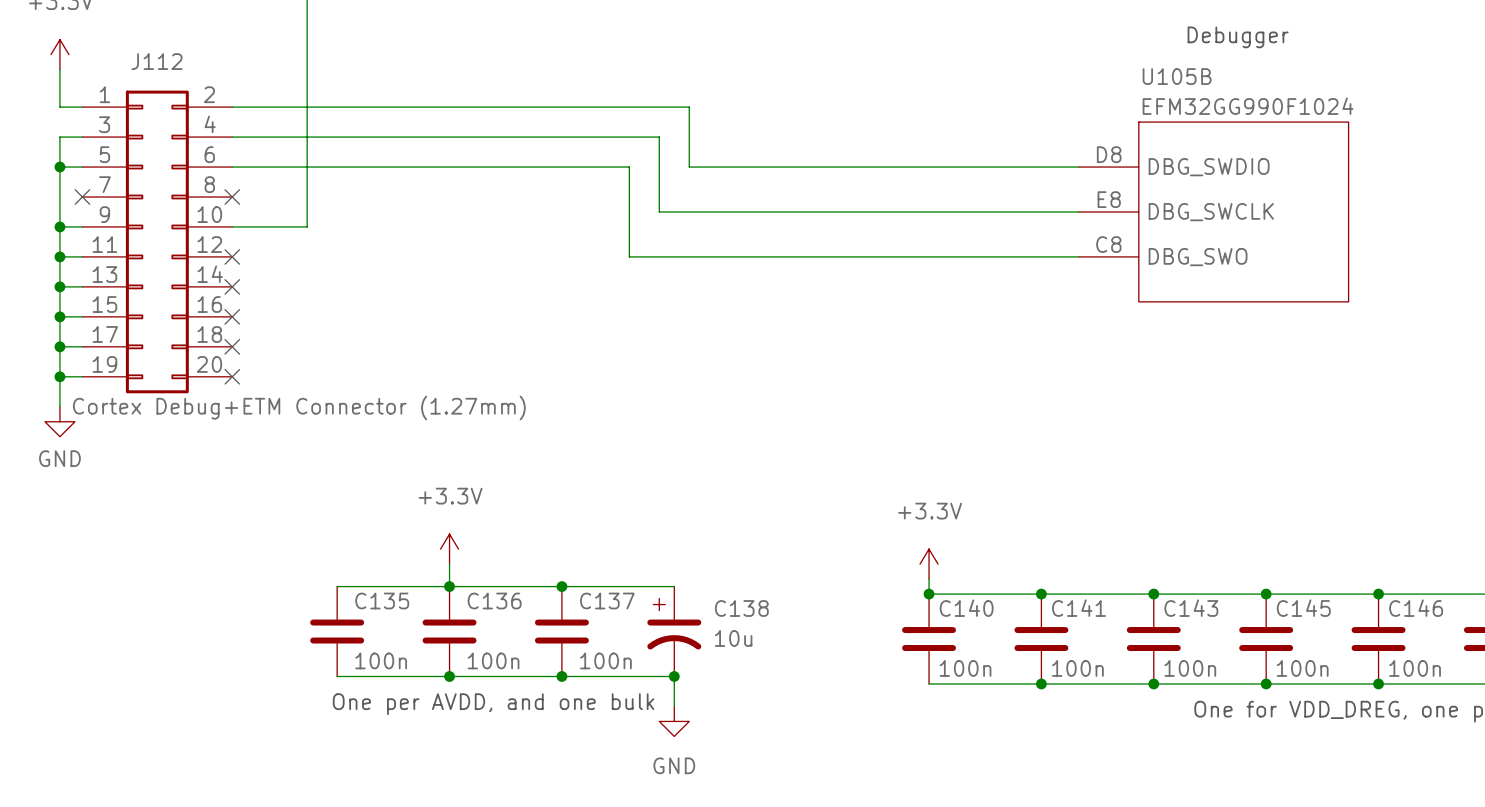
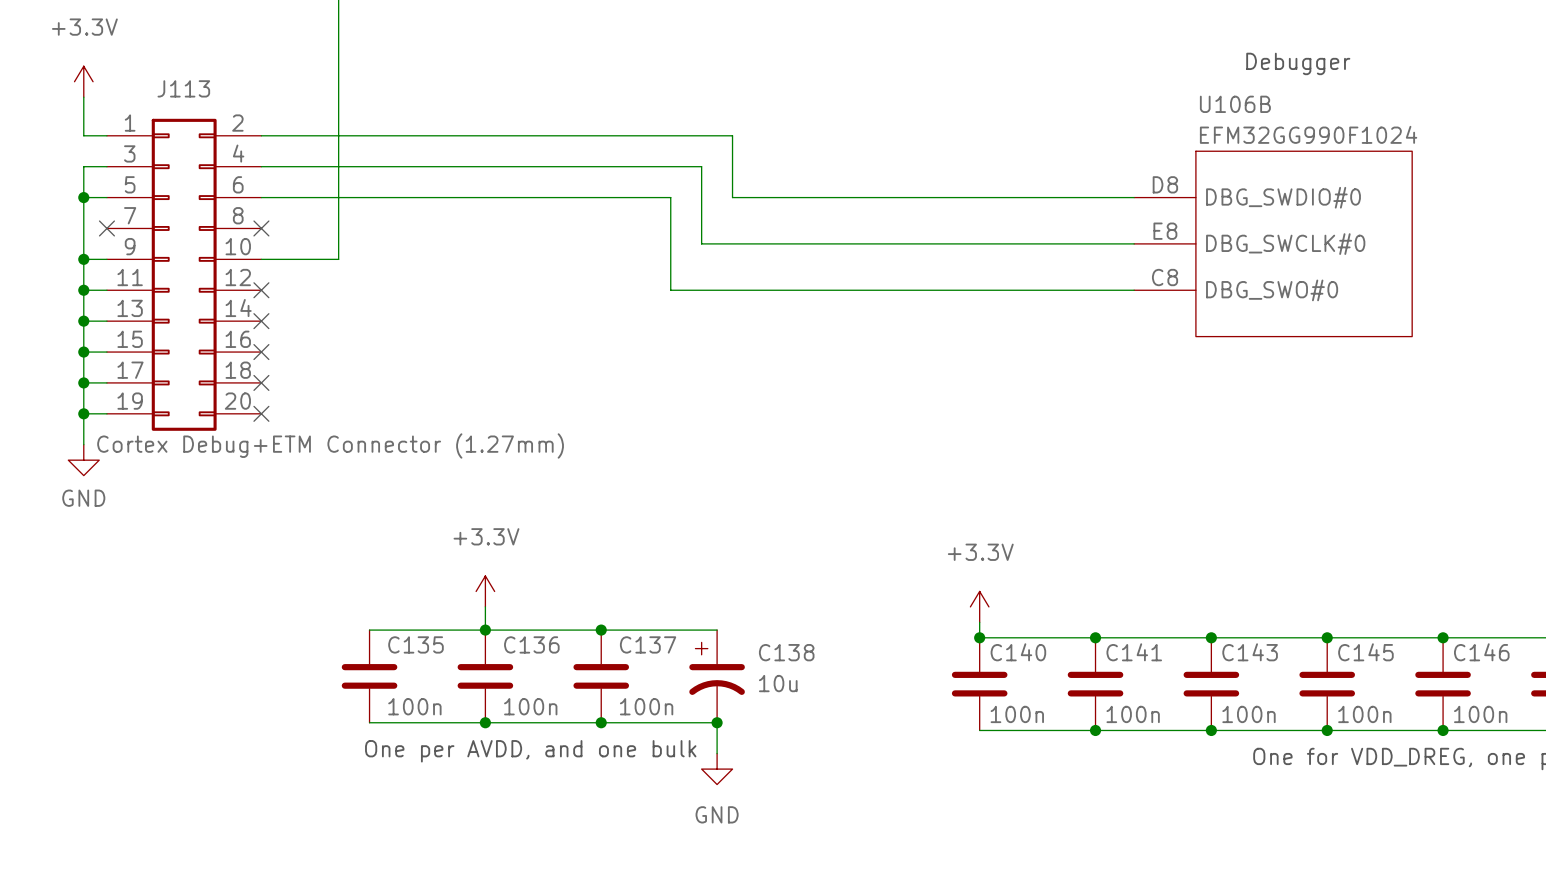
J112 name: J112 (156, 61) -> J113 (183, 88)
U105B name: U105B (1177, 76) -> U106B (1235, 104)
U105B pin name: DBG_SWDIO (1209, 167) -> DBG_SWDIO#0 (1283, 197)
U105B pin name: DBG_SWCLK (1211, 212) -> DBG_SWCLK#0 (1285, 244)
U105B pin name: DBG_SWO (1198, 257) -> DBG_SWO#0 (1272, 290)

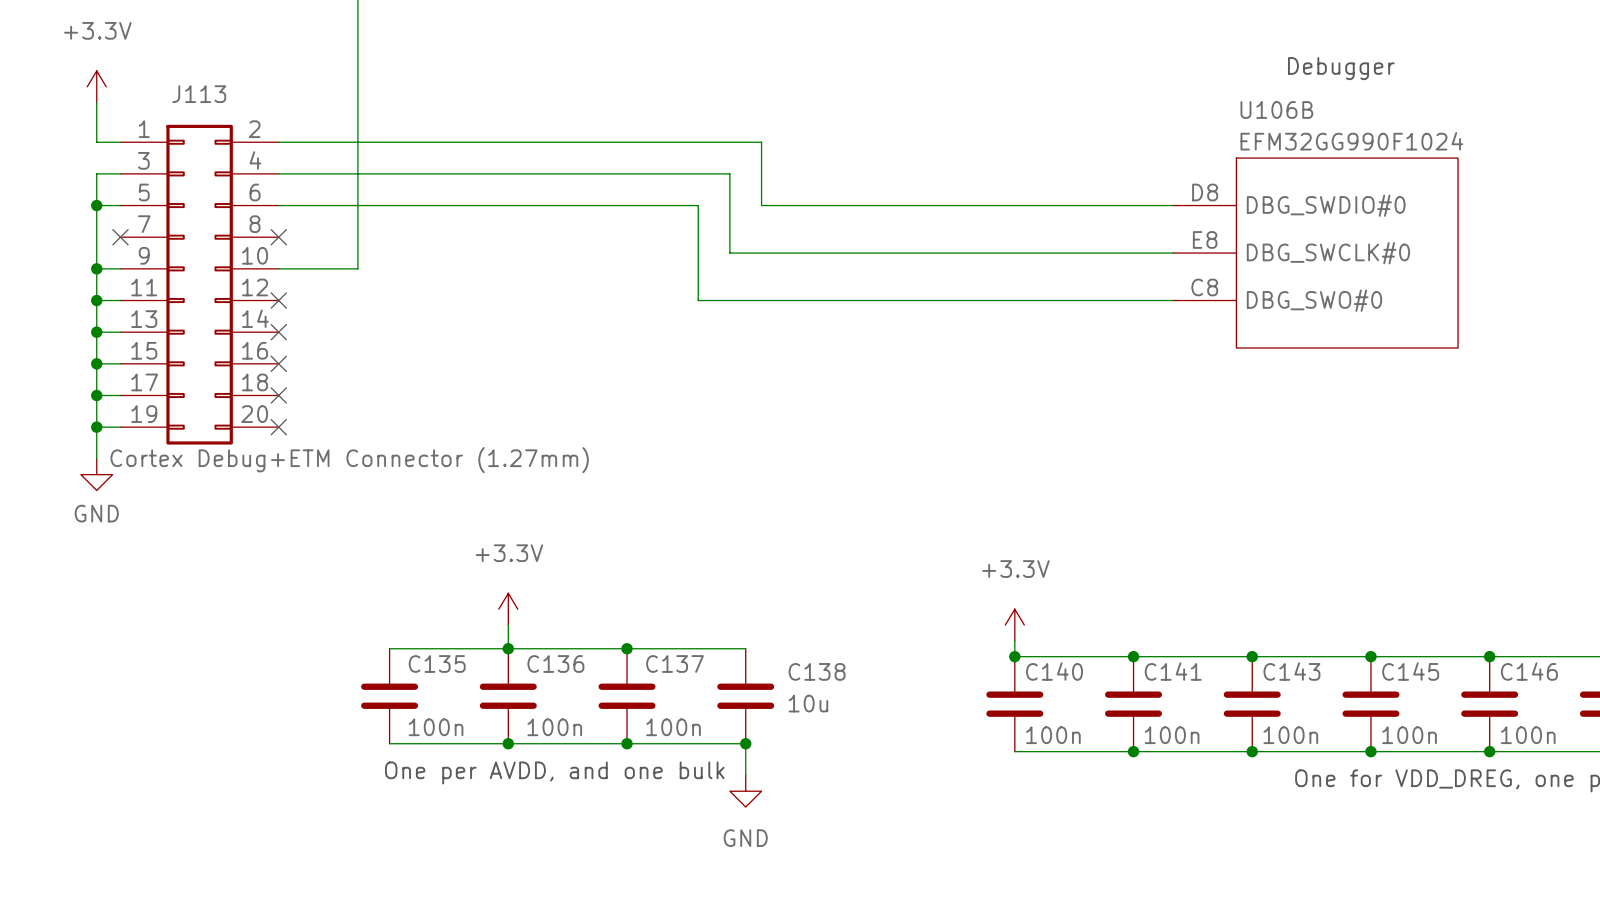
C138 symbol: [689, 630, 745, 723] -> [717, 648, 775, 744]

